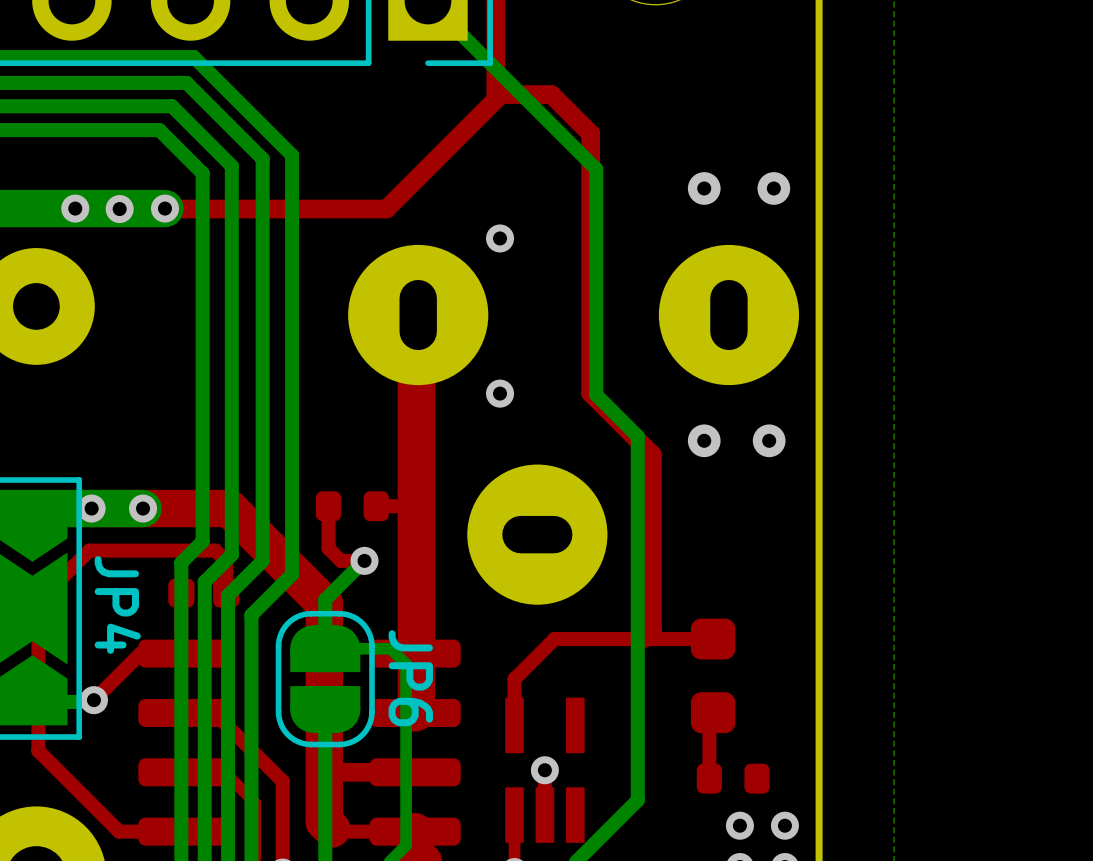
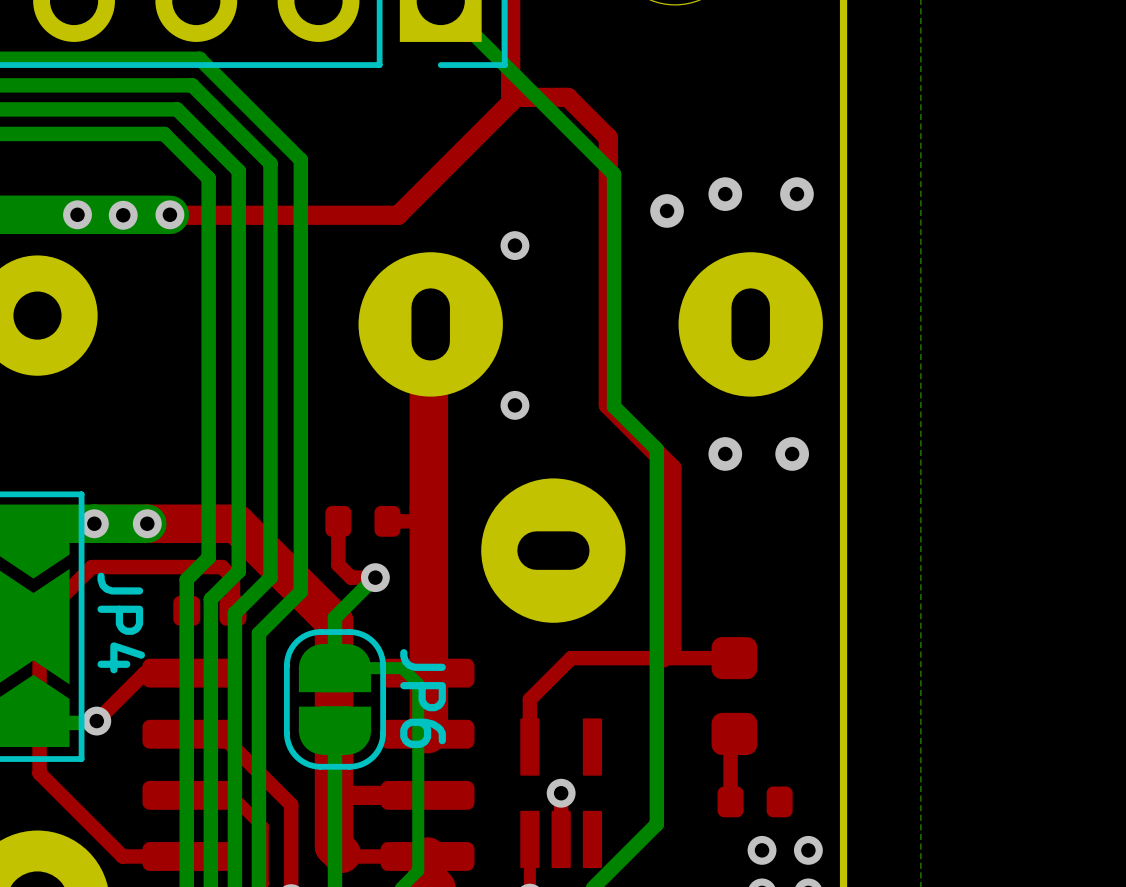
via: none -> (667, 210)

